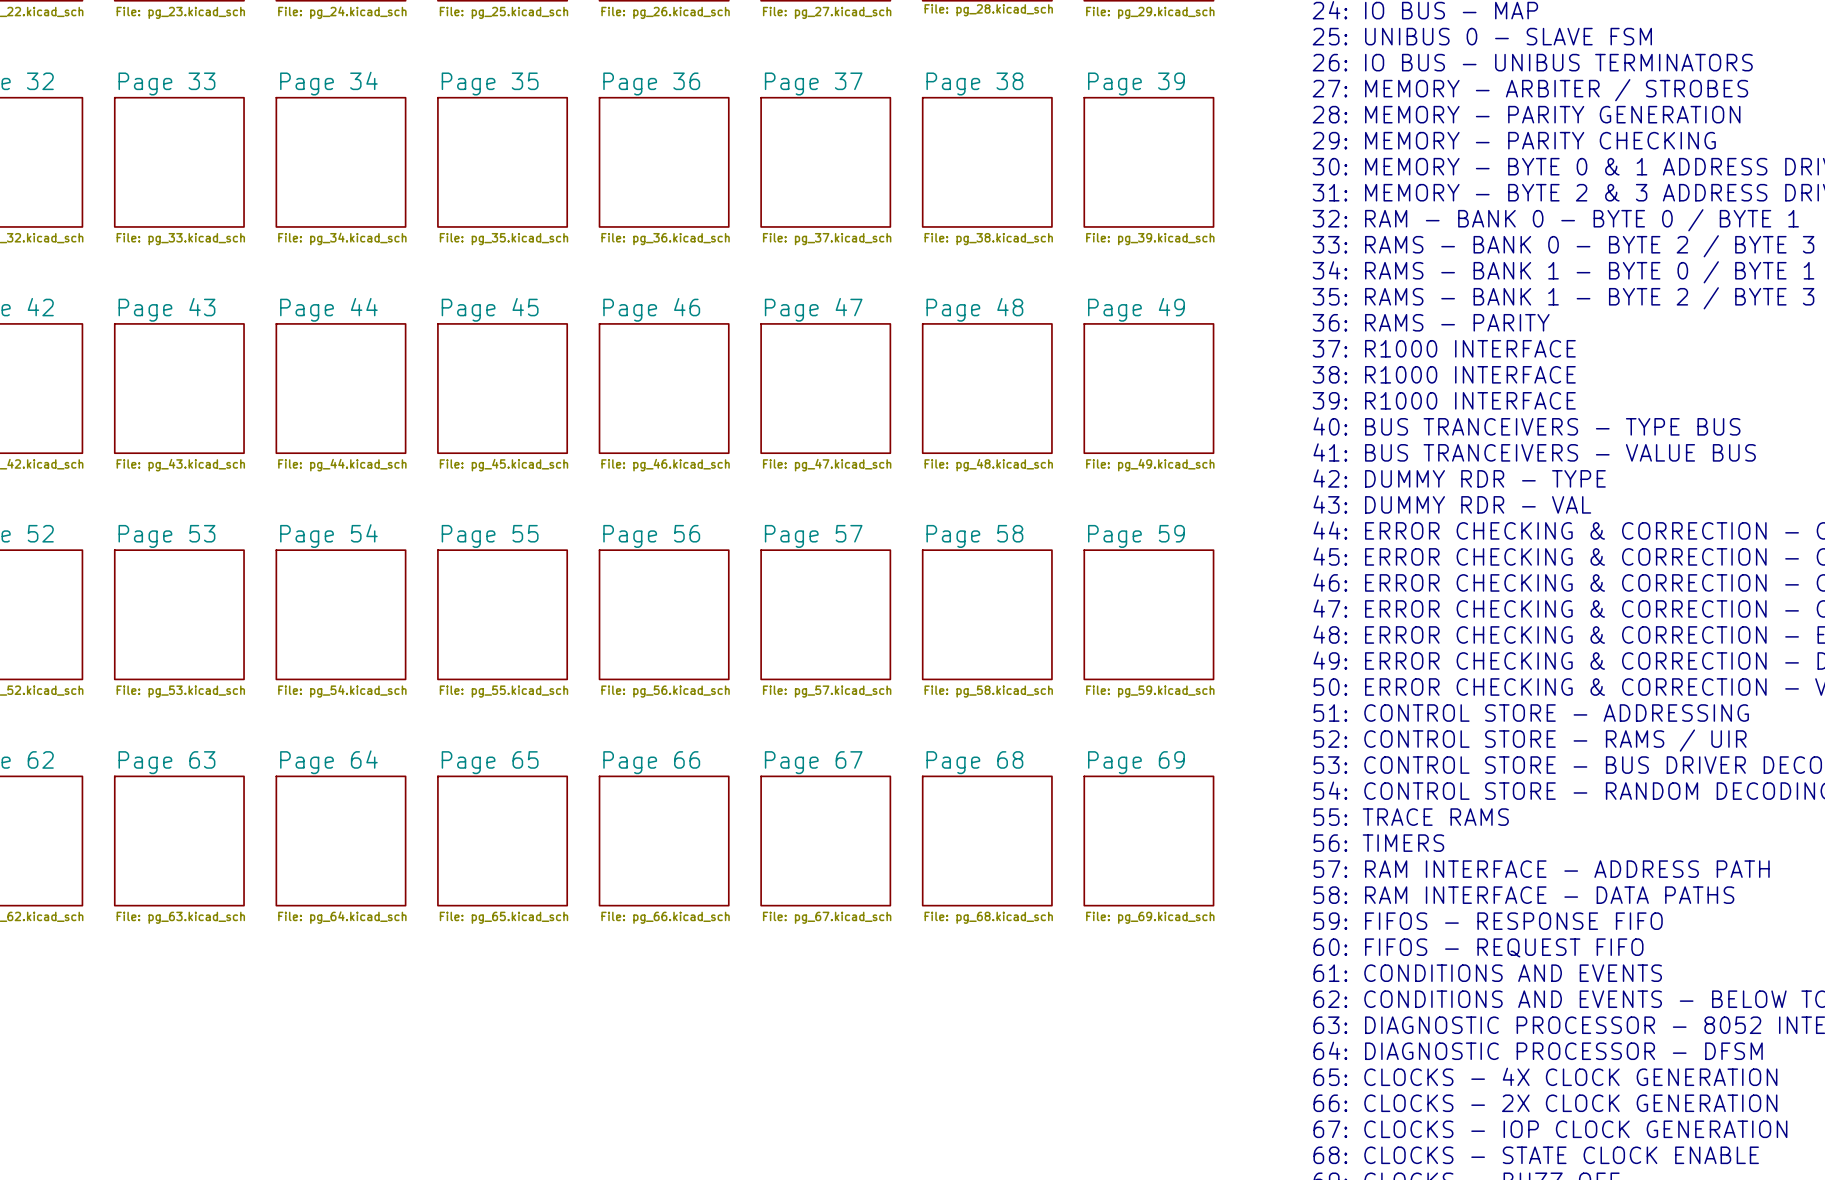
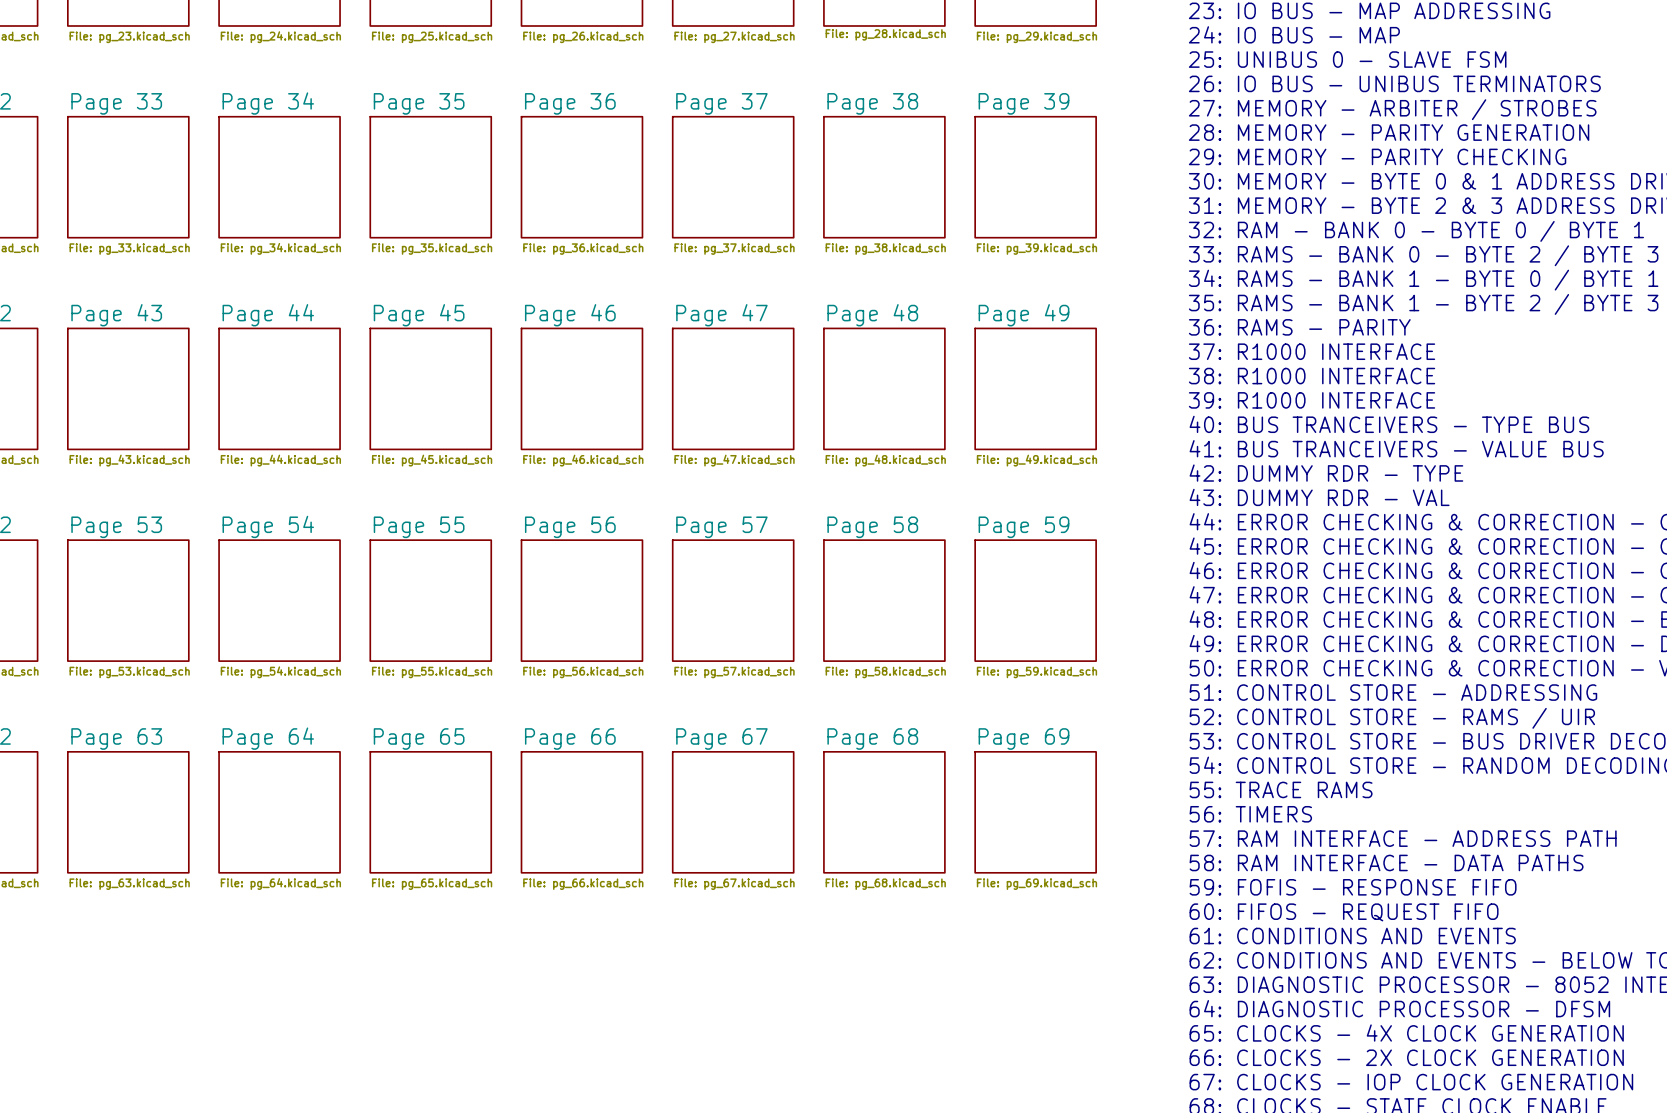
text: 59: FIFOS - RESPONSE FIFO (1488, 921) -> 59: FOFIS - RESPONSE FIFO (1353, 887)

